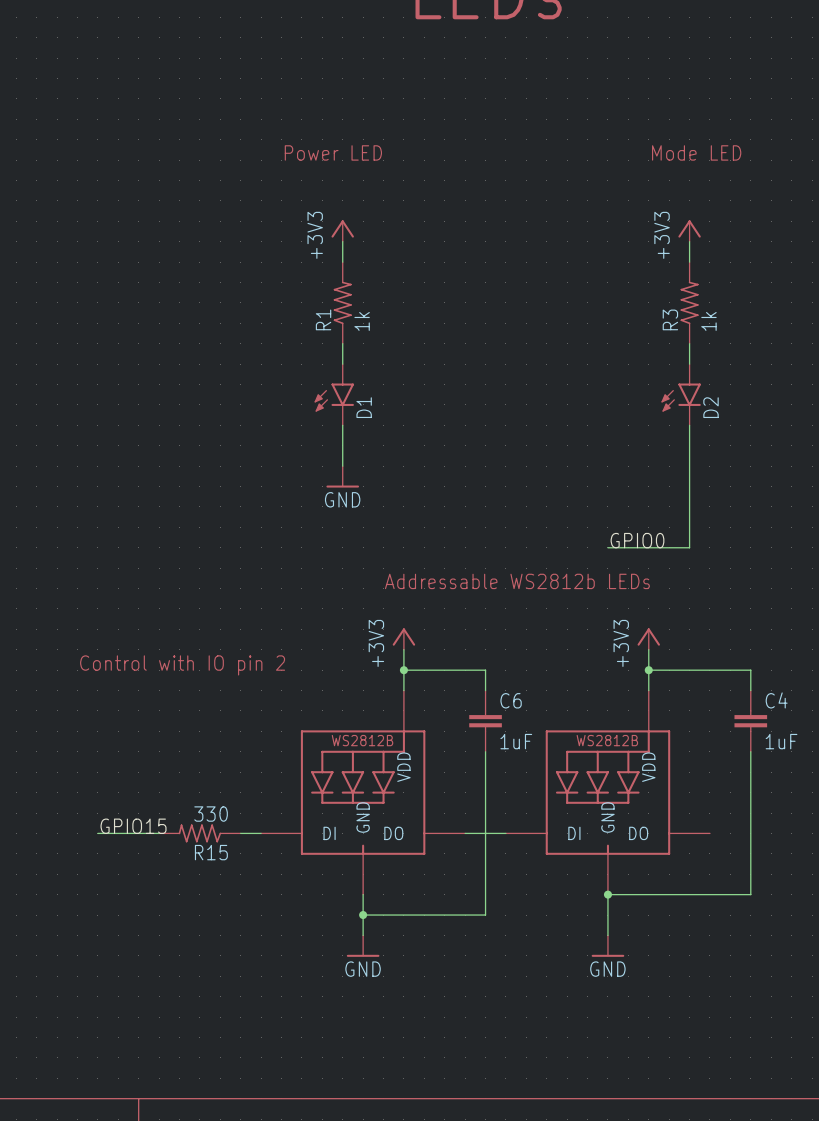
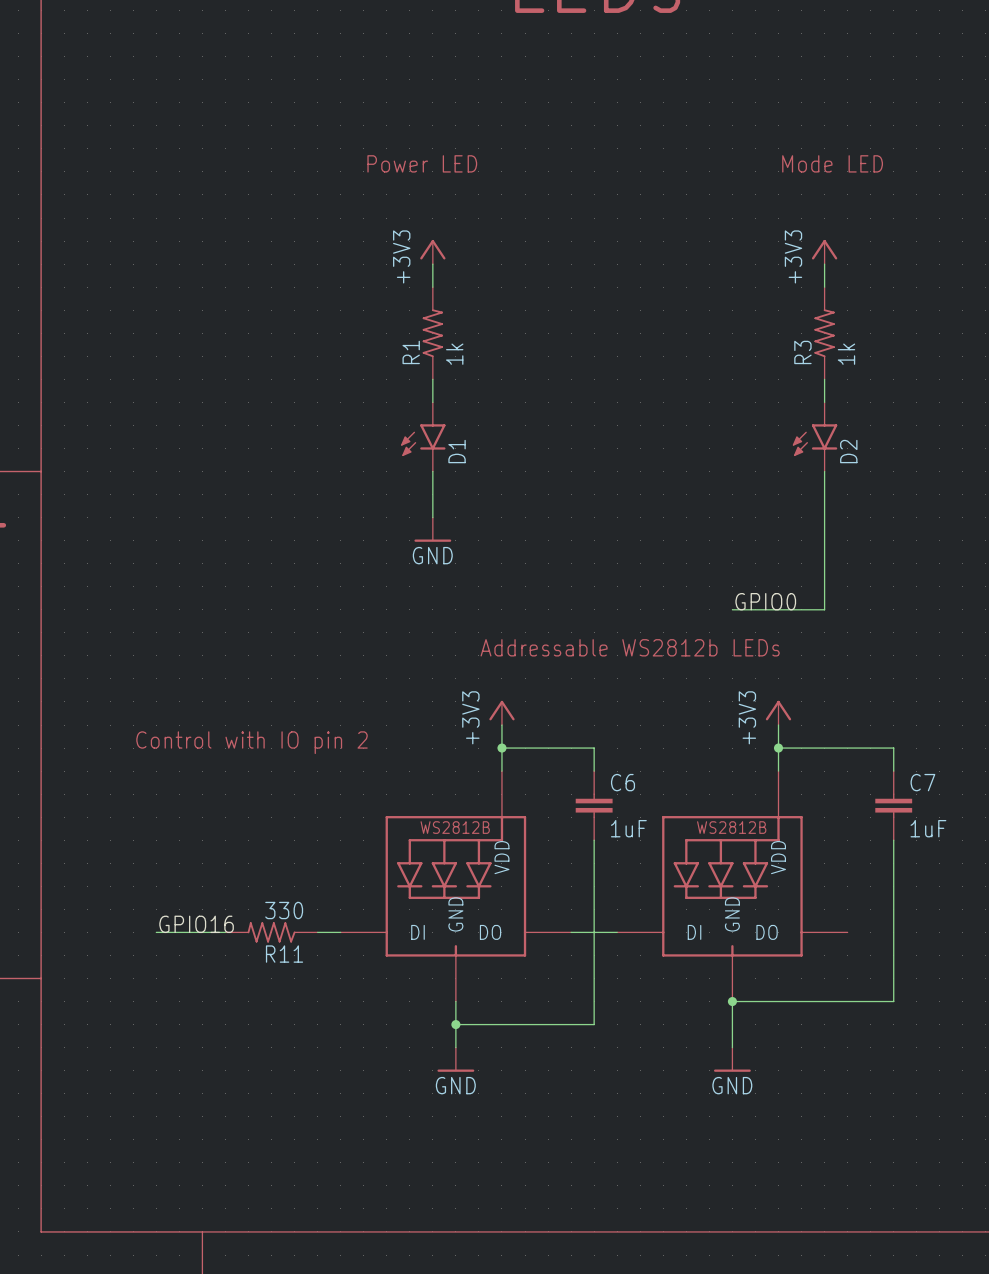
C4 name: C4 (776, 700) -> C7 (922, 782)
label: GPIO15 (133, 826) -> GPIO16 (196, 924)
R15 name: R15 (211, 852) -> R11 (284, 954)

